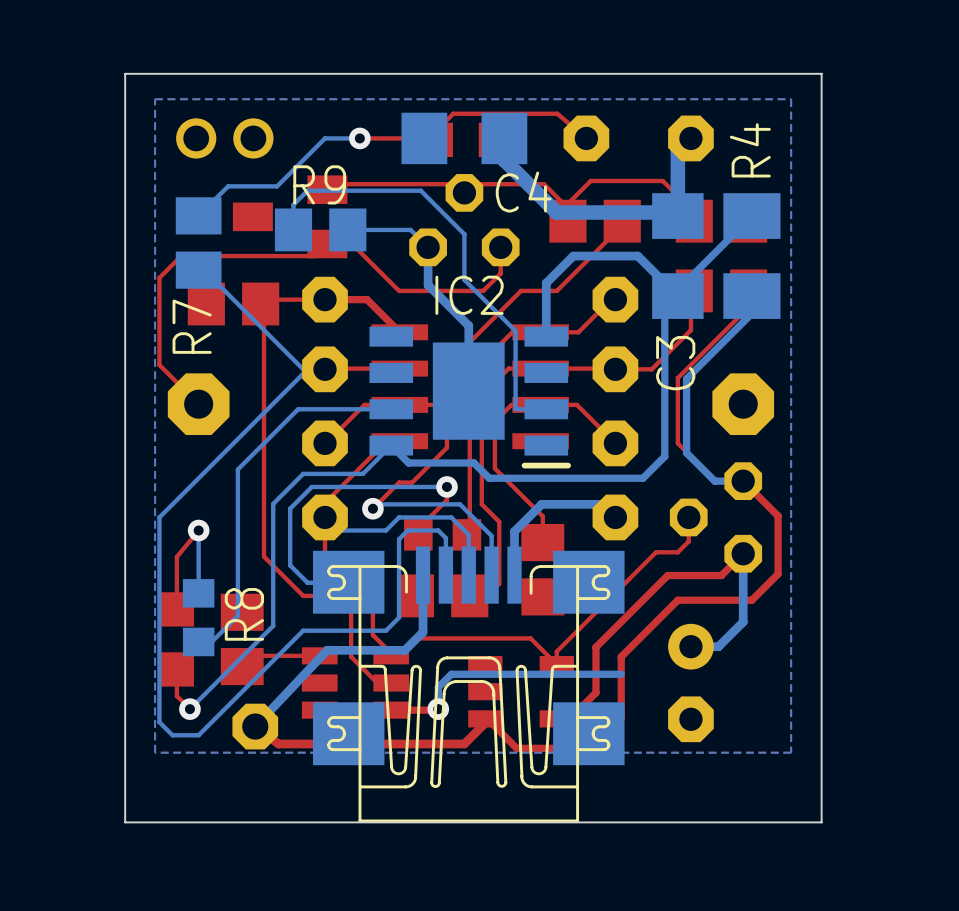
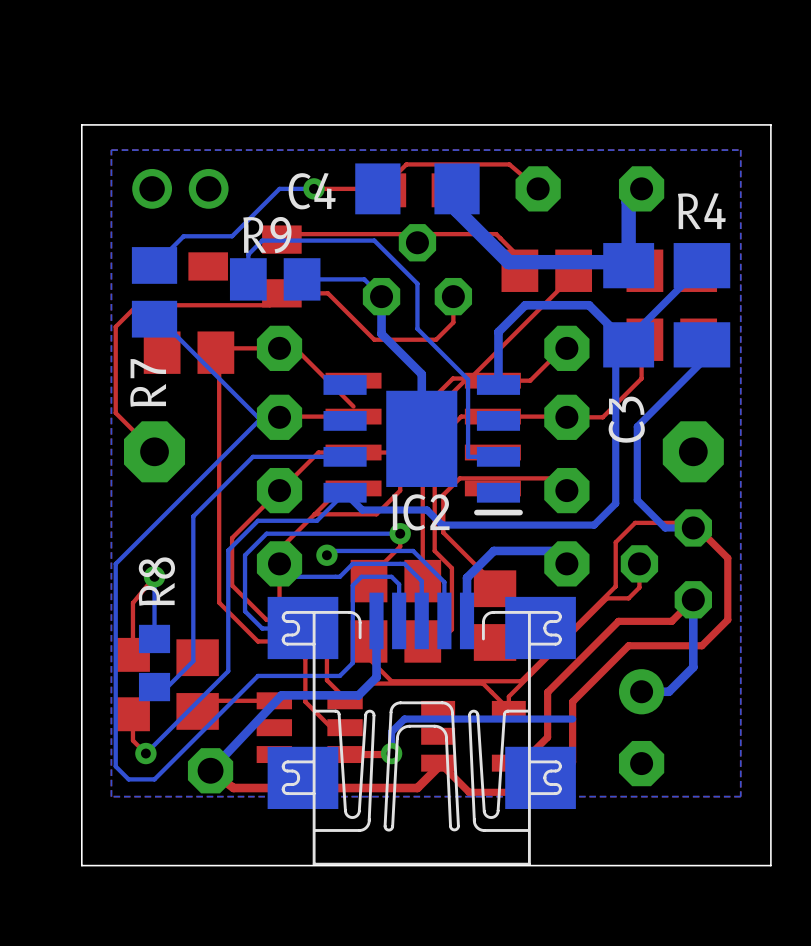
R4 name rotation: 0° (750, 150) -> 90° clockwise (701, 211)
C4 name position: C4 (523, 192) -> C4 (312, 191)
top track: (565, 205) (590, 180) (662, 180) (694, 212) (694, 221) -> none
top track: (352, 244) (399, 290) (420, 290) -> (306, 293) (327, 293) (374, 339)
top track: (556, 290) (521, 290) (446, 364) (446, 383) -> (508, 339) (470, 378) (452, 378) (400, 431)
top track: (748, 290) (748, 307) (677, 378) (677, 443) (715, 481) (743, 481) (778, 515) -> (369, 641) (369, 658) (391, 681) (520, 681) (615, 586) (615, 542) (635, 522) (692, 522) (727, 558) (727, 562)
IC2 name position: IC2 (469, 295) -> IC2 (420, 512)
top track: (340, 299) (367, 299) (399, 332) -> (295, 348) (353, 406)
top track: (603, 431) (576, 404) (511, 404) (494, 421) (494, 468) (542, 516) (542, 542) -> (554, 478) (459, 478) (443, 494) (443, 532) (495, 584)
top track: none -> (279, 490) (232, 538) (232, 585) (266, 619) (292, 619)
top track: (446, 443) (446, 447) (412, 482) (399, 482) (372, 508) -> (400, 490) (376, 514) (314, 514)
part footprint: [404, 519, 482, 551] -> [350, 559, 442, 603]
R8 name position: R8 (244, 614) -> R8 (156, 581)

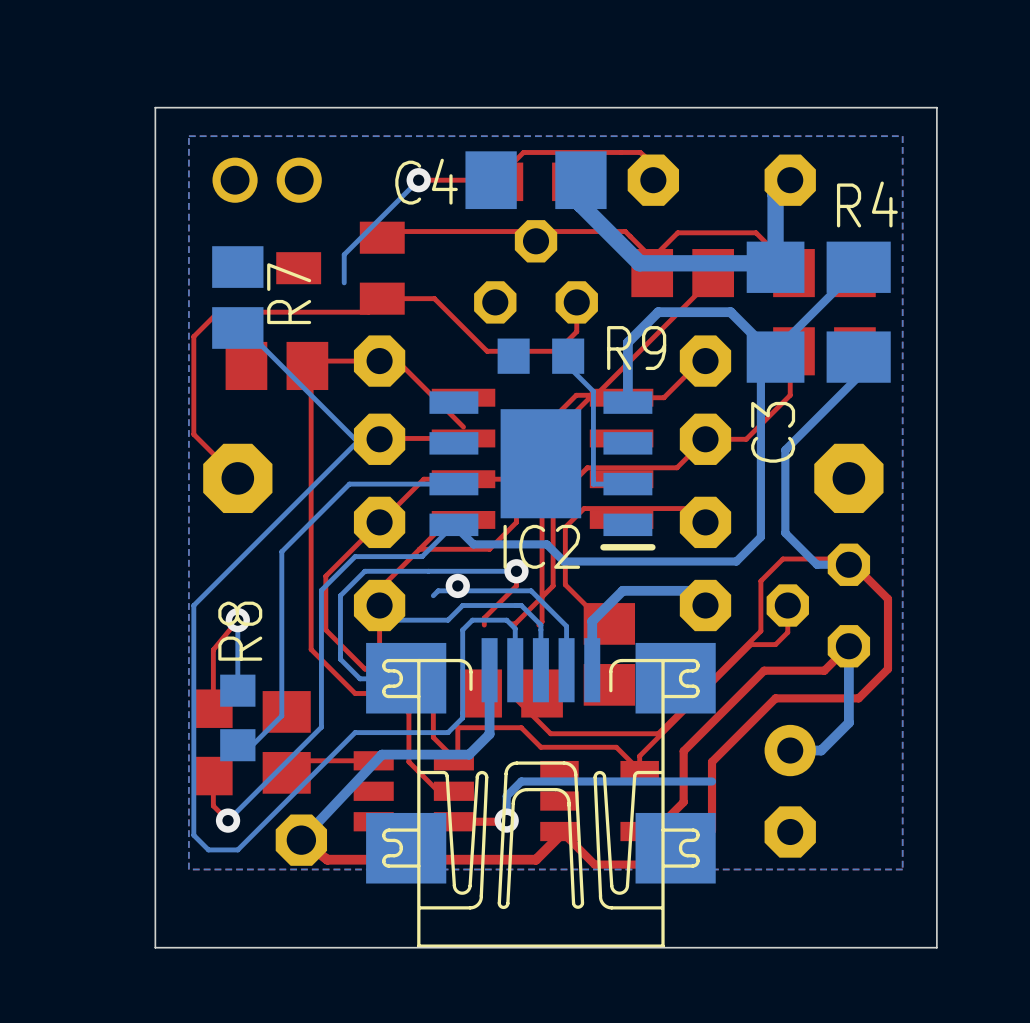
bottom track: (314, 188) (279, 188) (232, 236) (183, 236) (157, 262) -> (418, 180) (360, 238)
part position: (538, 188) -> (653, 180)
R9 name position: R9 (267, 235) -> R9 (636, 348)
bottom track: (262, 240) (374, 240) (417, 283) (417, 328) (468, 379) -> (568, 356) (568, 366) (593, 391) (593, 396)
top track: none -> (652, 258) (677, 232) (756, 232) (785, 262)
R9 footprint: [229, 258, 321, 301] -> [497, 338, 585, 374]
bottom track: (302, 279) (364, 279) (381, 296) (381, 333) (421, 374) (421, 438) -> none
R7 name position: R7 (148, 382) -> R7 (289, 293)
top track: (566, 417) (461, 416) (434, 443) (434, 550) (451, 568) (451, 629) (440, 641) (422, 641) -> (705, 439) (676, 467) (587, 467) (553, 502) (553, 585) (515, 623) (511, 623)
top track: (443, 532) (495, 584) -> (565, 570) (565, 584) (604, 623) (609, 623)
via position: (326, 555) -> (457, 585)
part footprint: [473, 570, 517, 661] -> [583, 603, 636, 706]
part: (395, 581) -> none
top track: (369, 641) (369, 658) (391, 681) (520, 681) (525, 676) -> (511, 684) (511, 694) (550, 733) (658, 733)
top track: (488, 688) (482, 683) (370, 683) (353, 700) (348, 700) -> (616, 747) (540, 747) (521, 727) (457, 727) (457, 760)

